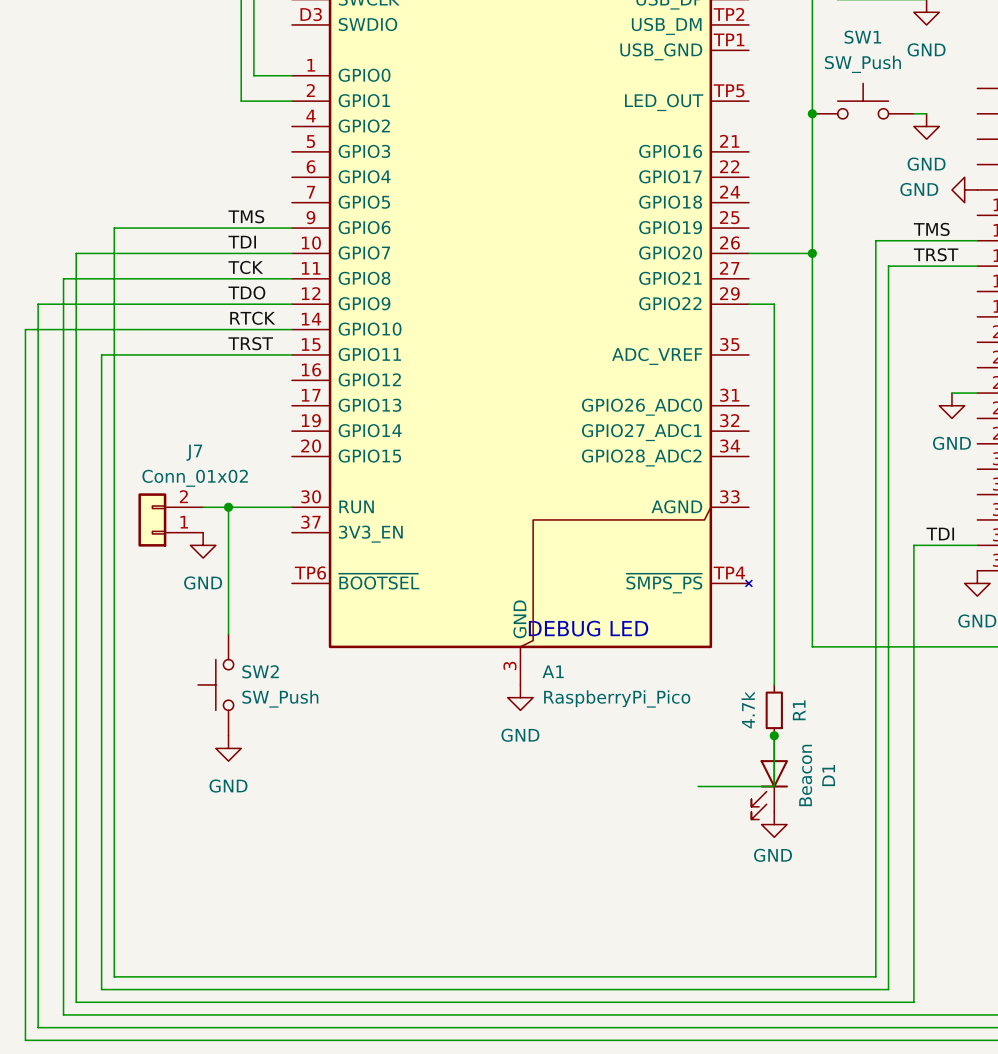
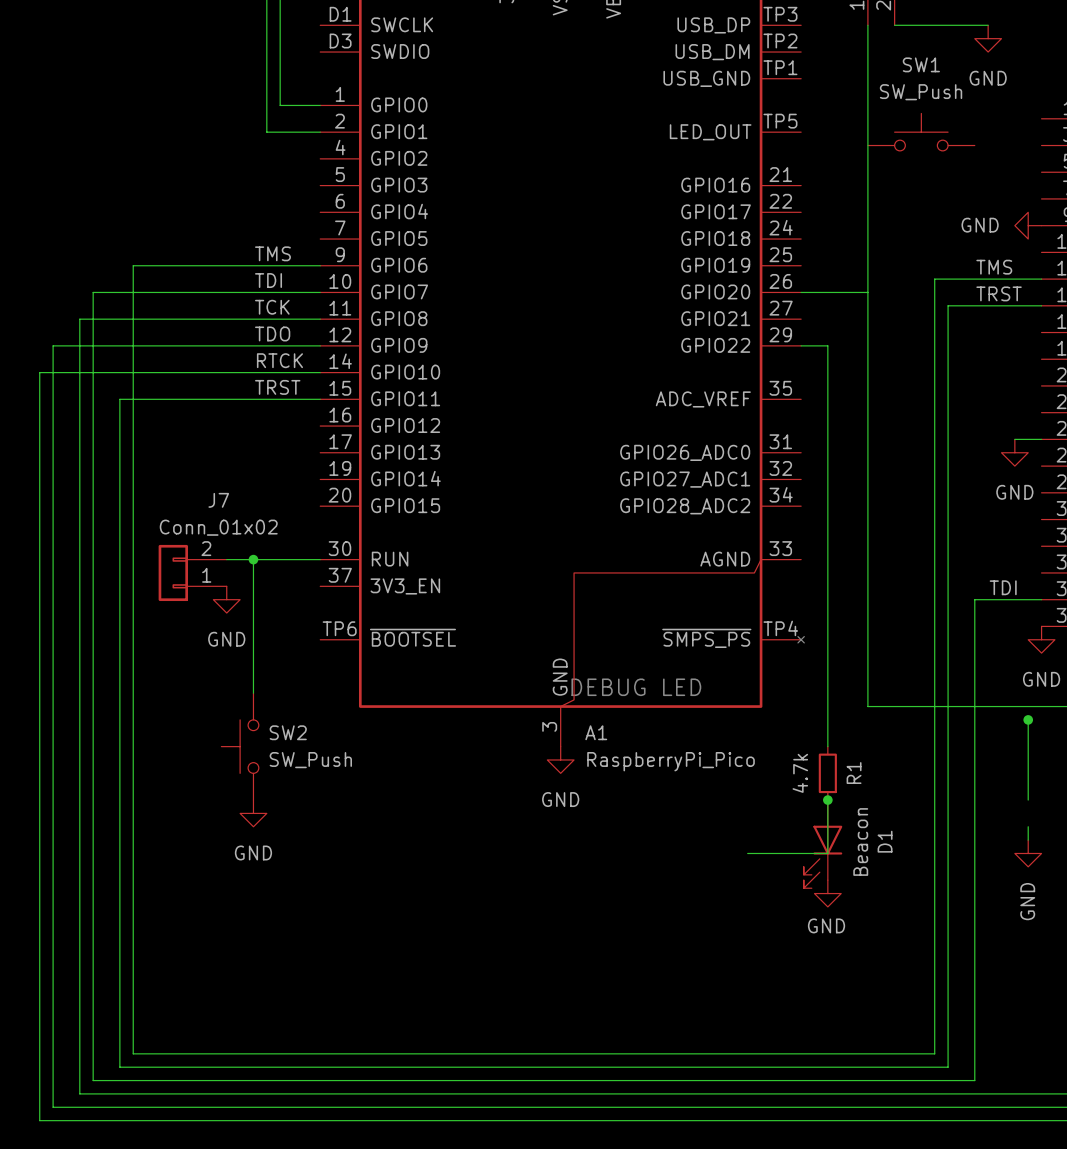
junction: (812, 113) -> none
wire: (913, 113) (926, 113) -> none
power symbol: GND (926, 126) -> none
junction: (812, 253) -> none
wire: none -> (1028, 719) (1028, 800)
junction: none -> (1028, 719)
wire: none -> (1028, 826) (1028, 840)
power symbol: none -> GND (1028, 853)

